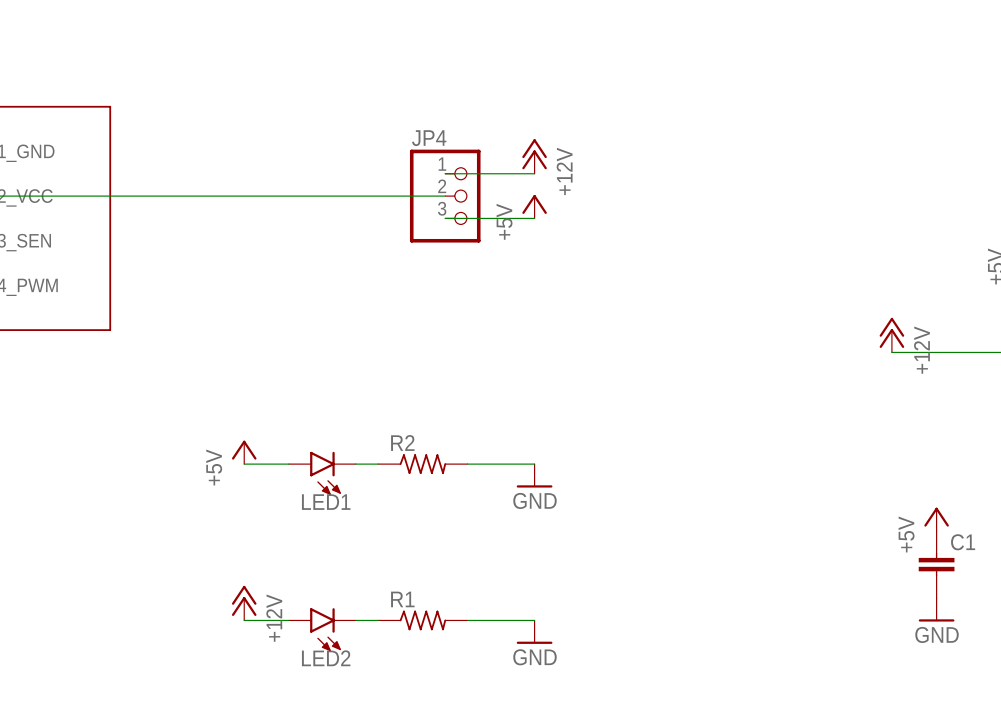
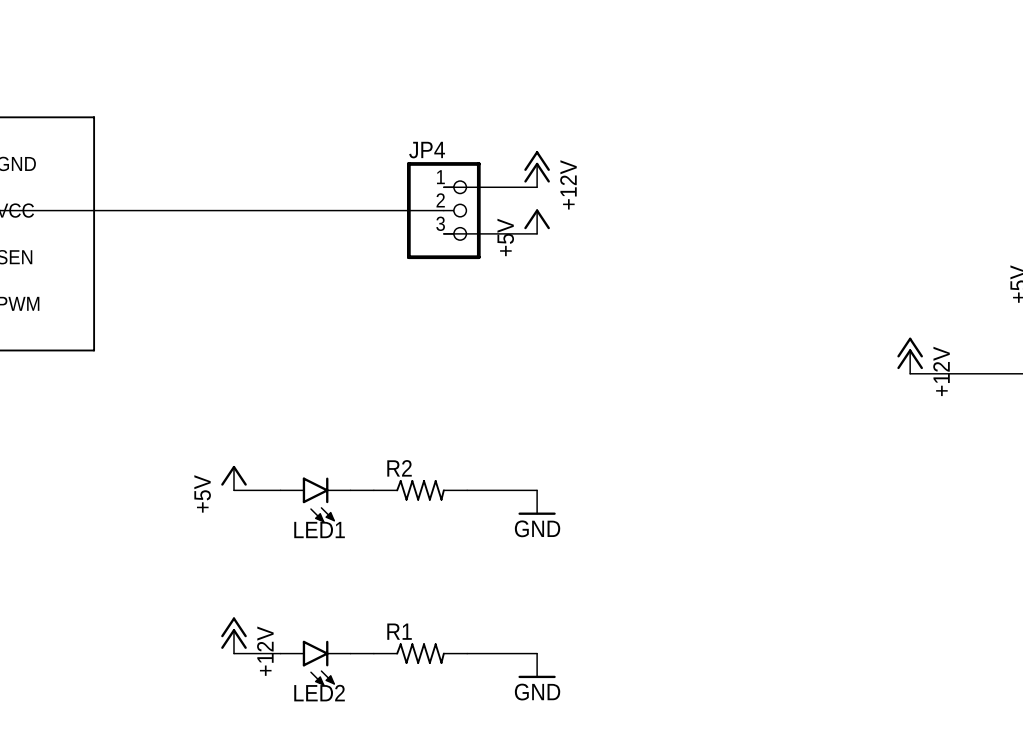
power symbol: +5V (936, 519) -> none
C1: (936, 564) -> none
power symbol: GND (936, 609) -> none

